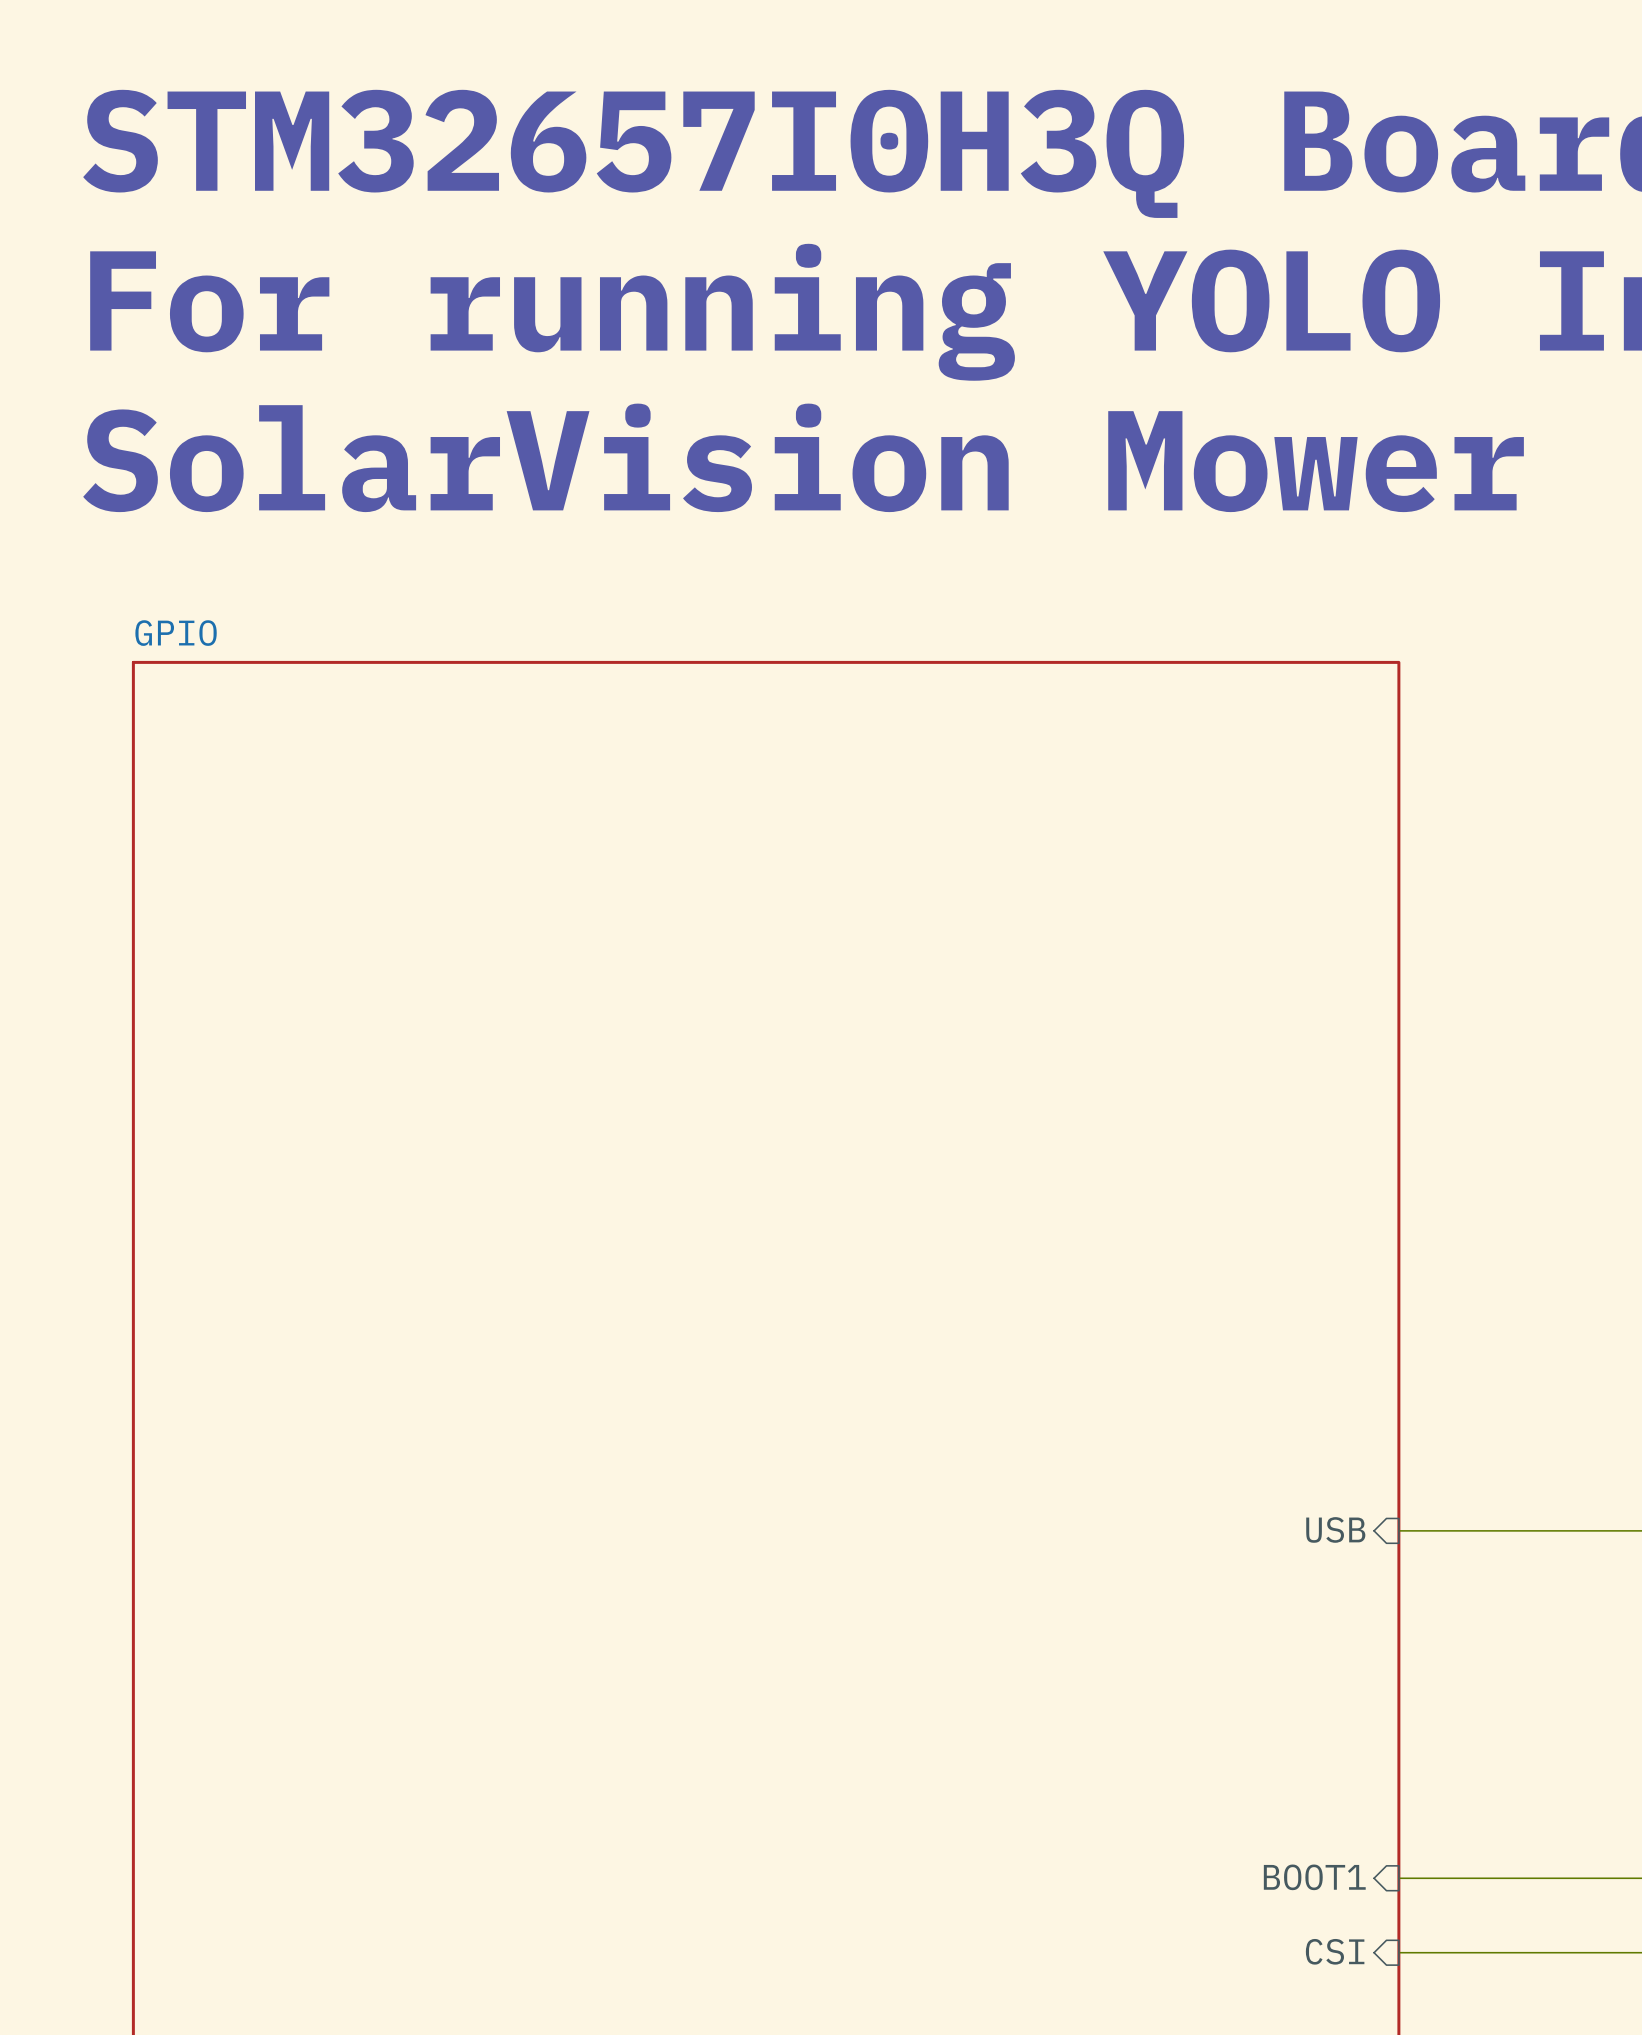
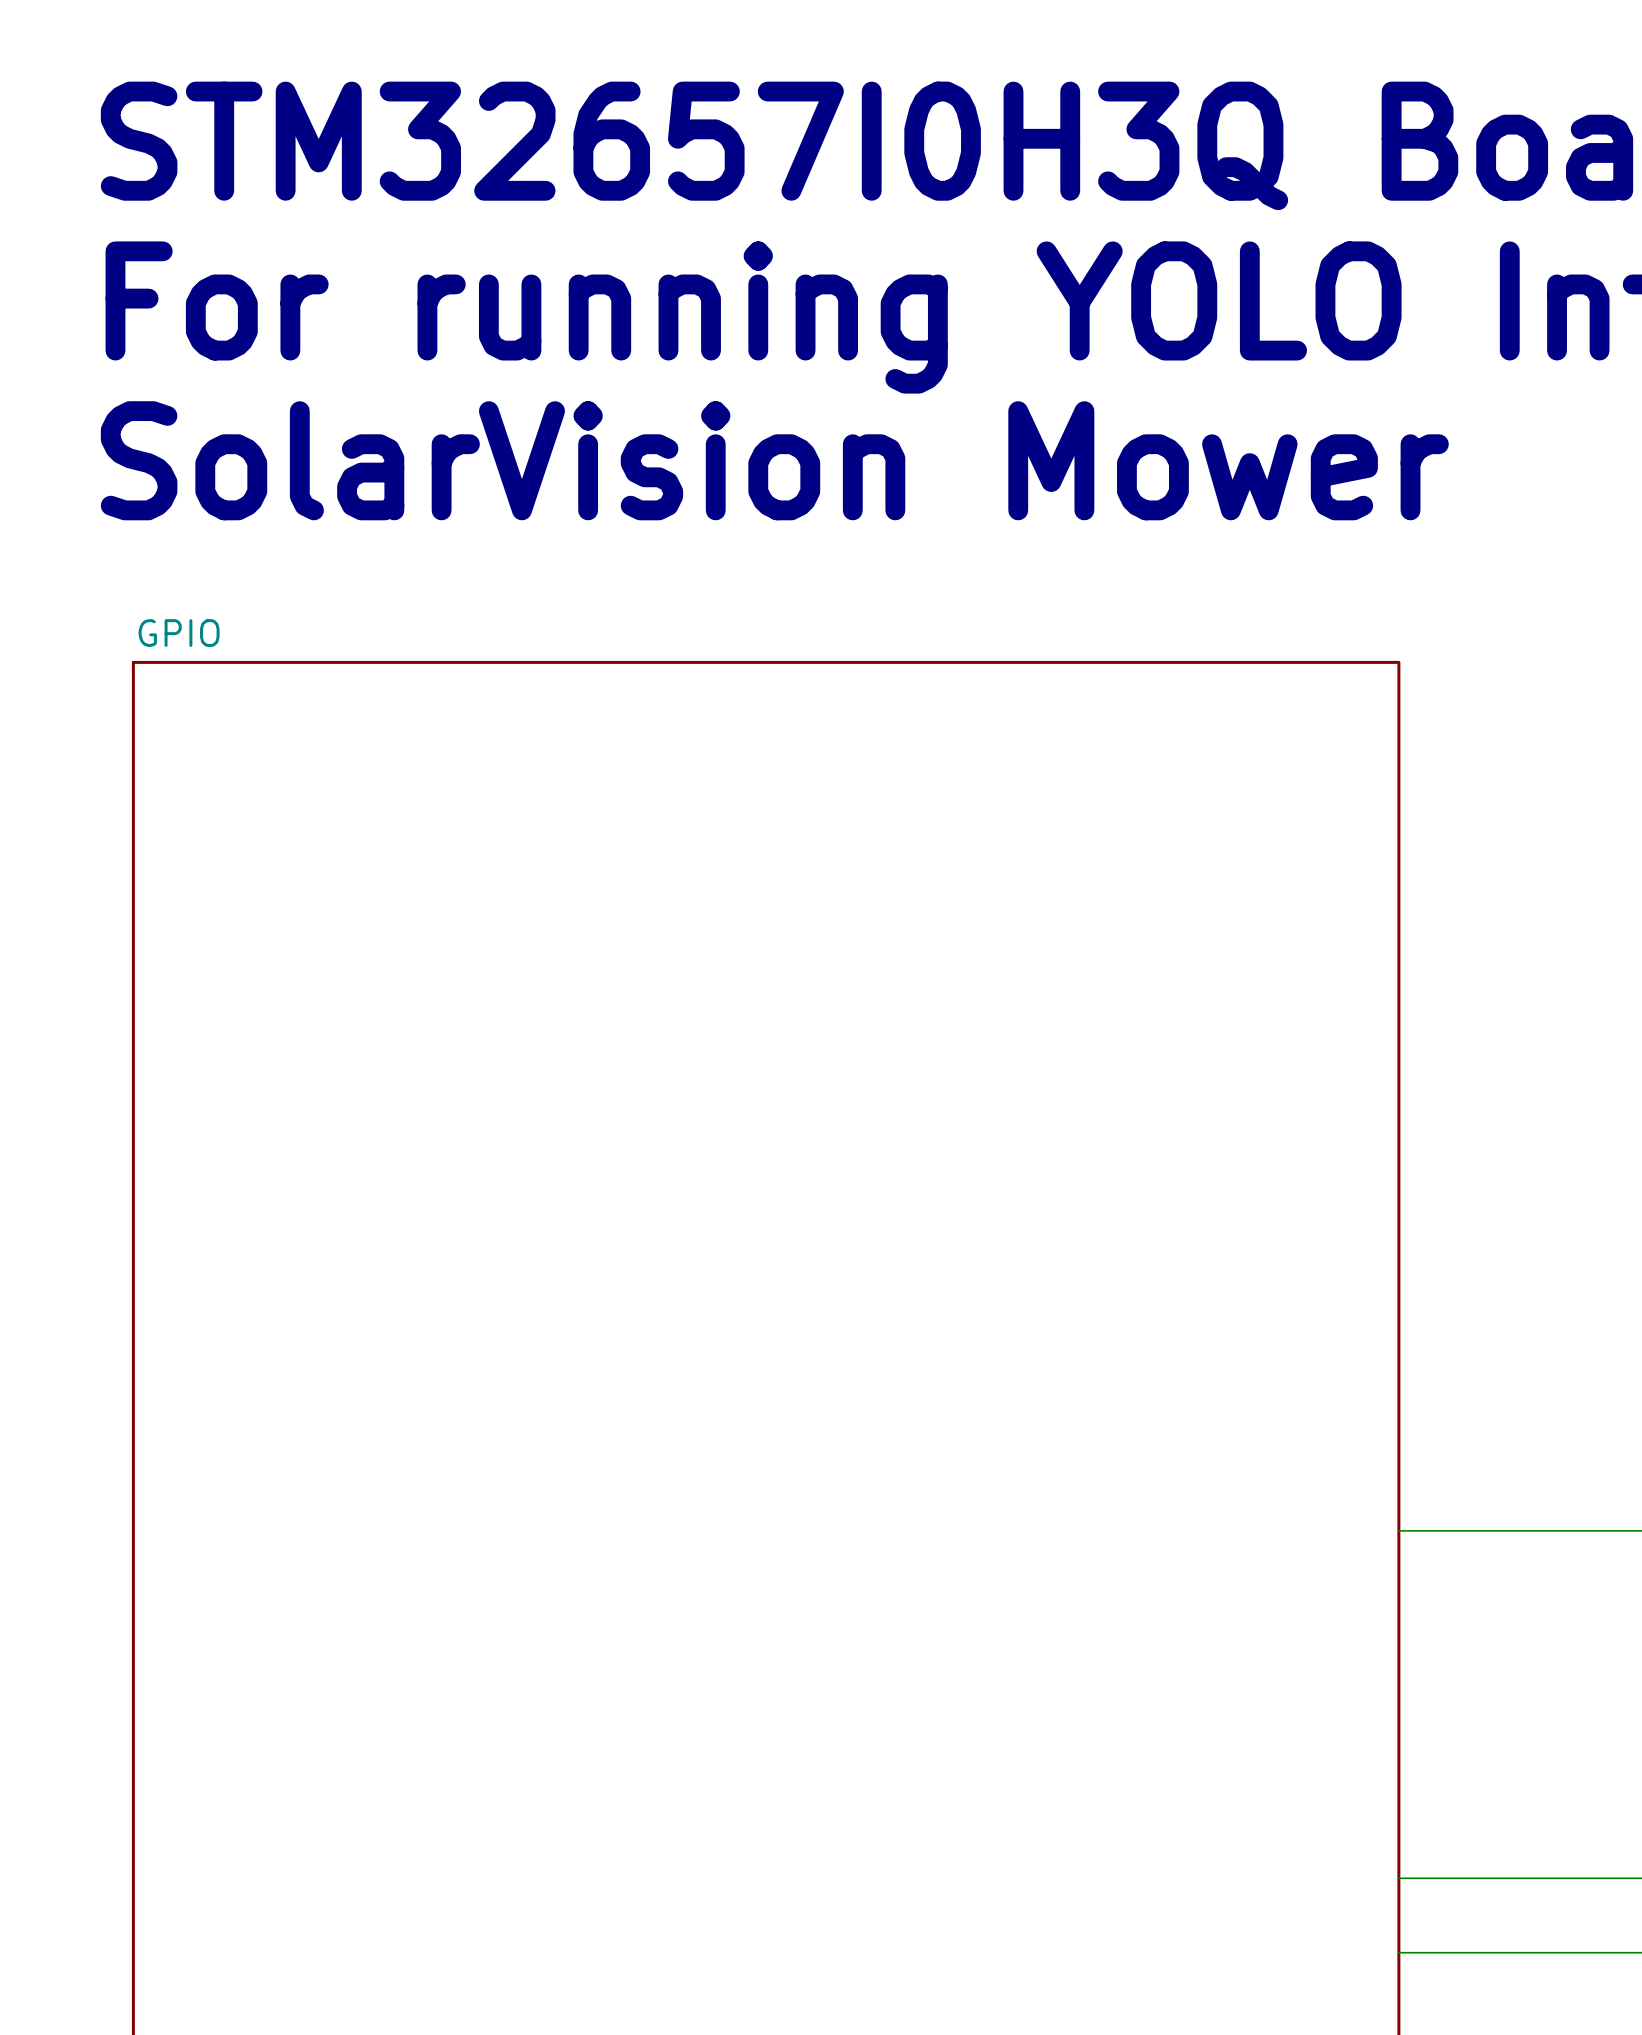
sheet pin: USB (1335, 1529) -> none
sheet pin: BOOT1 (1314, 1877) -> none
sheet pin: CSI (1335, 1951) -> none

